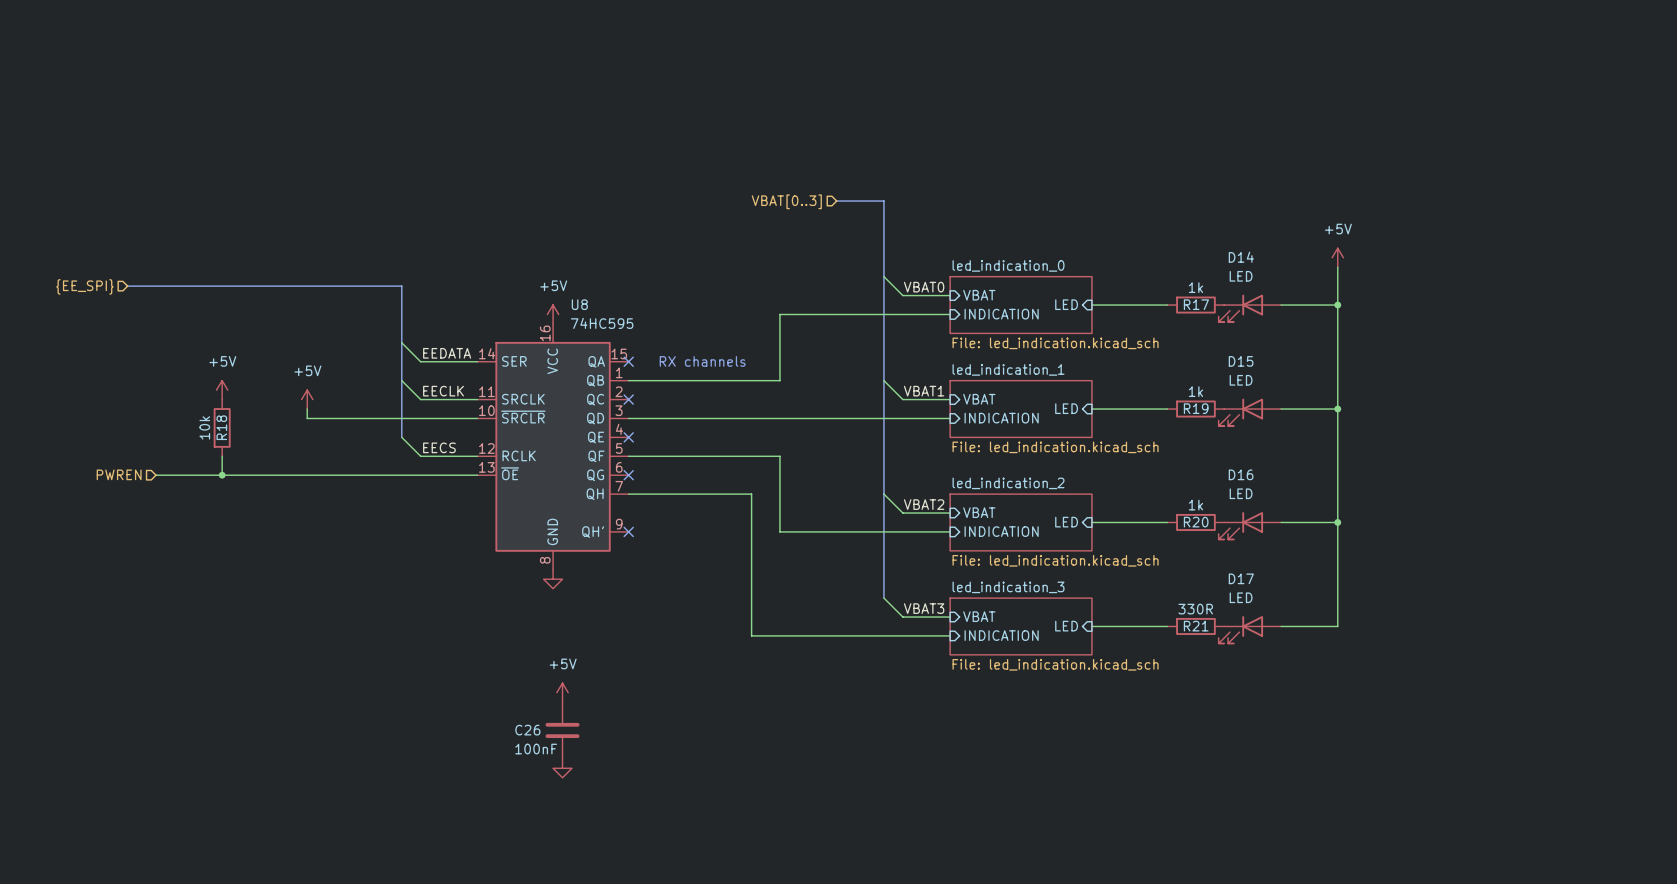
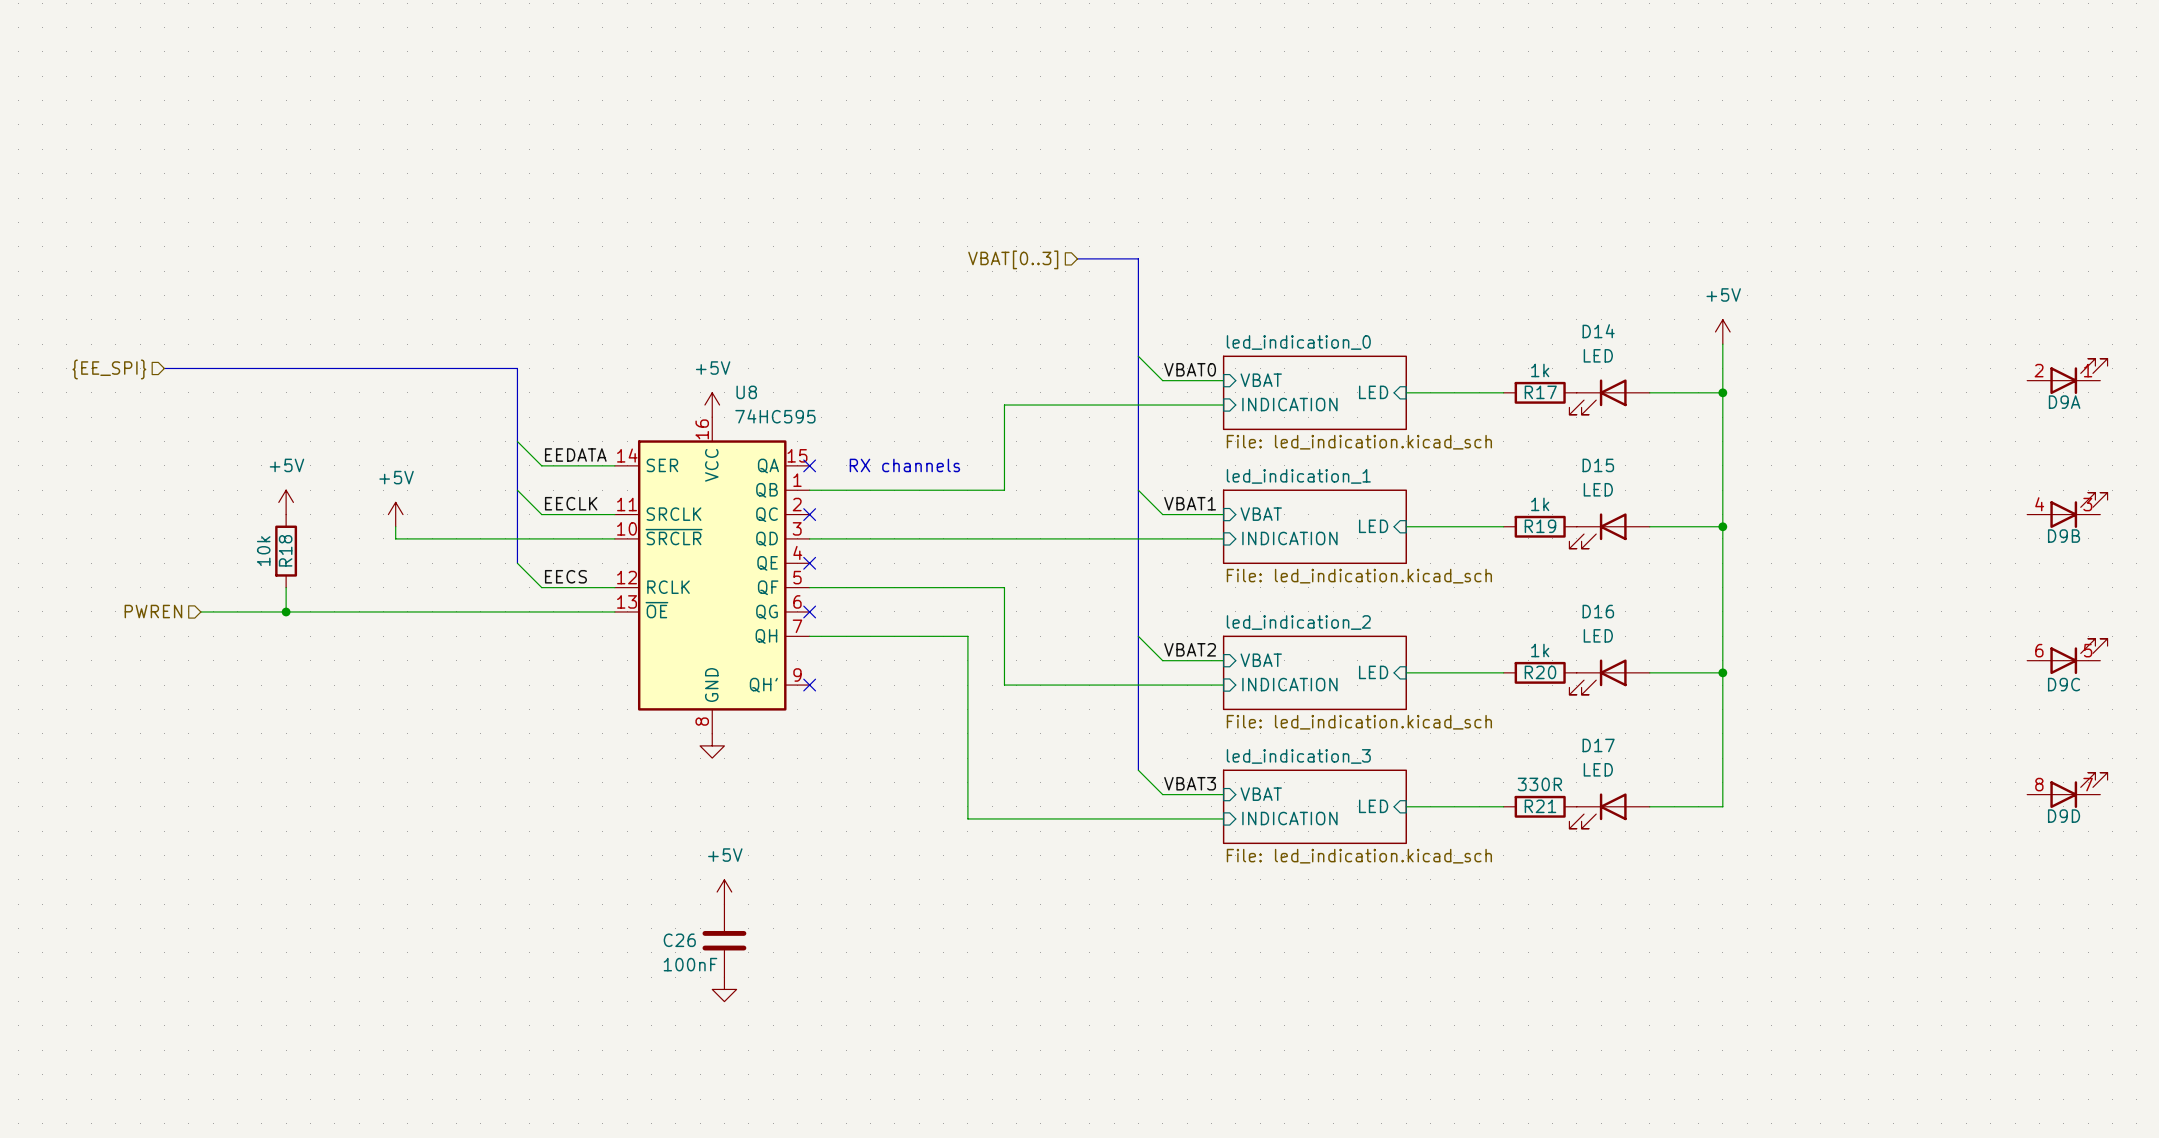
D9A: none -> (2067, 376)
D9B: none -> (2067, 510)
D9C: none -> (2067, 656)
D9D: none -> (2067, 790)

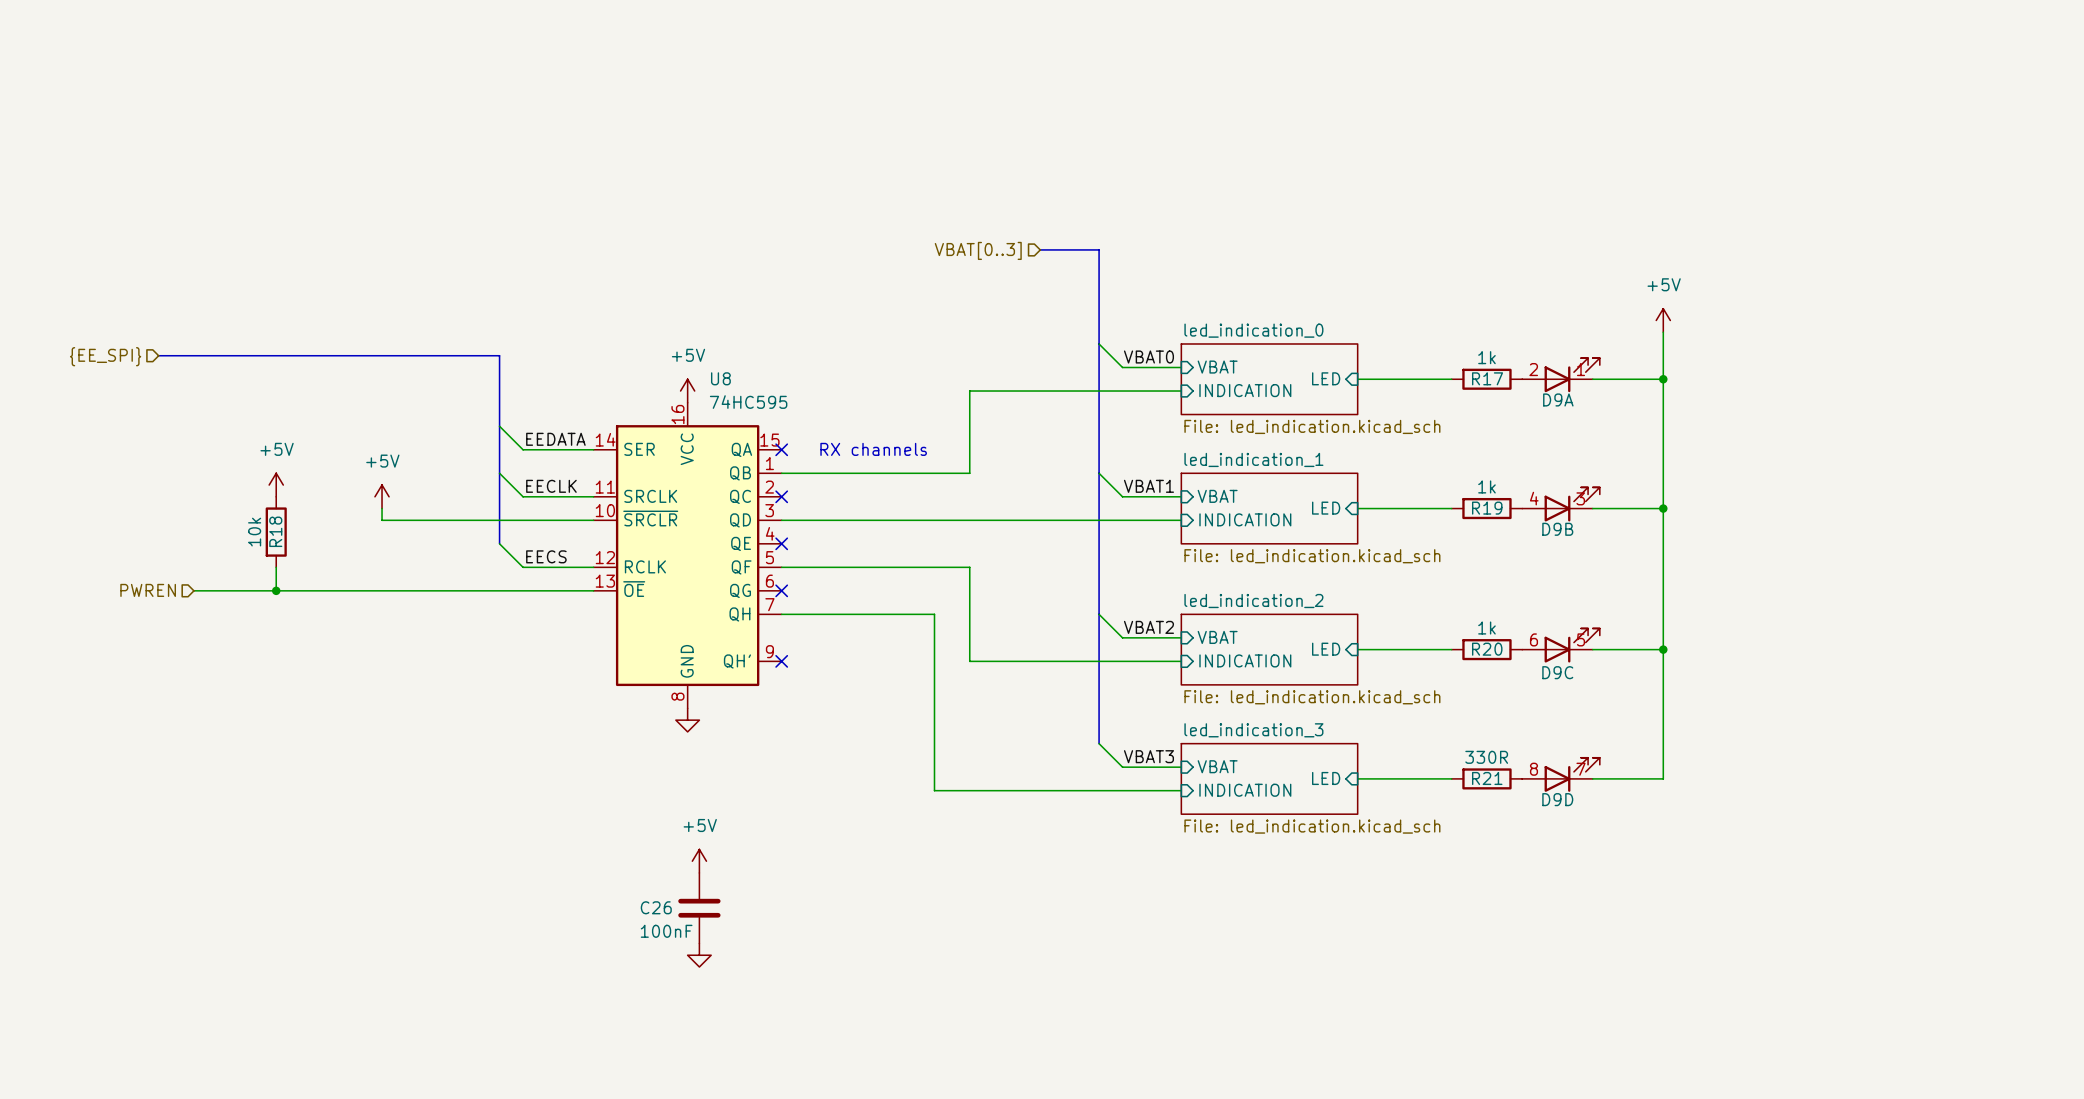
D9A position: (2067, 376) -> (1561, 375)
D14: LED (1609, 397) -> none
D9B position: (2067, 510) -> (1561, 504)
D15: LED (1609, 531) -> none
D9C position: (2067, 656) -> (1561, 645)
D16: LED (1609, 677) -> none
D9D position: (2067, 790) -> (1561, 774)
D17: LED (1609, 811) -> none

